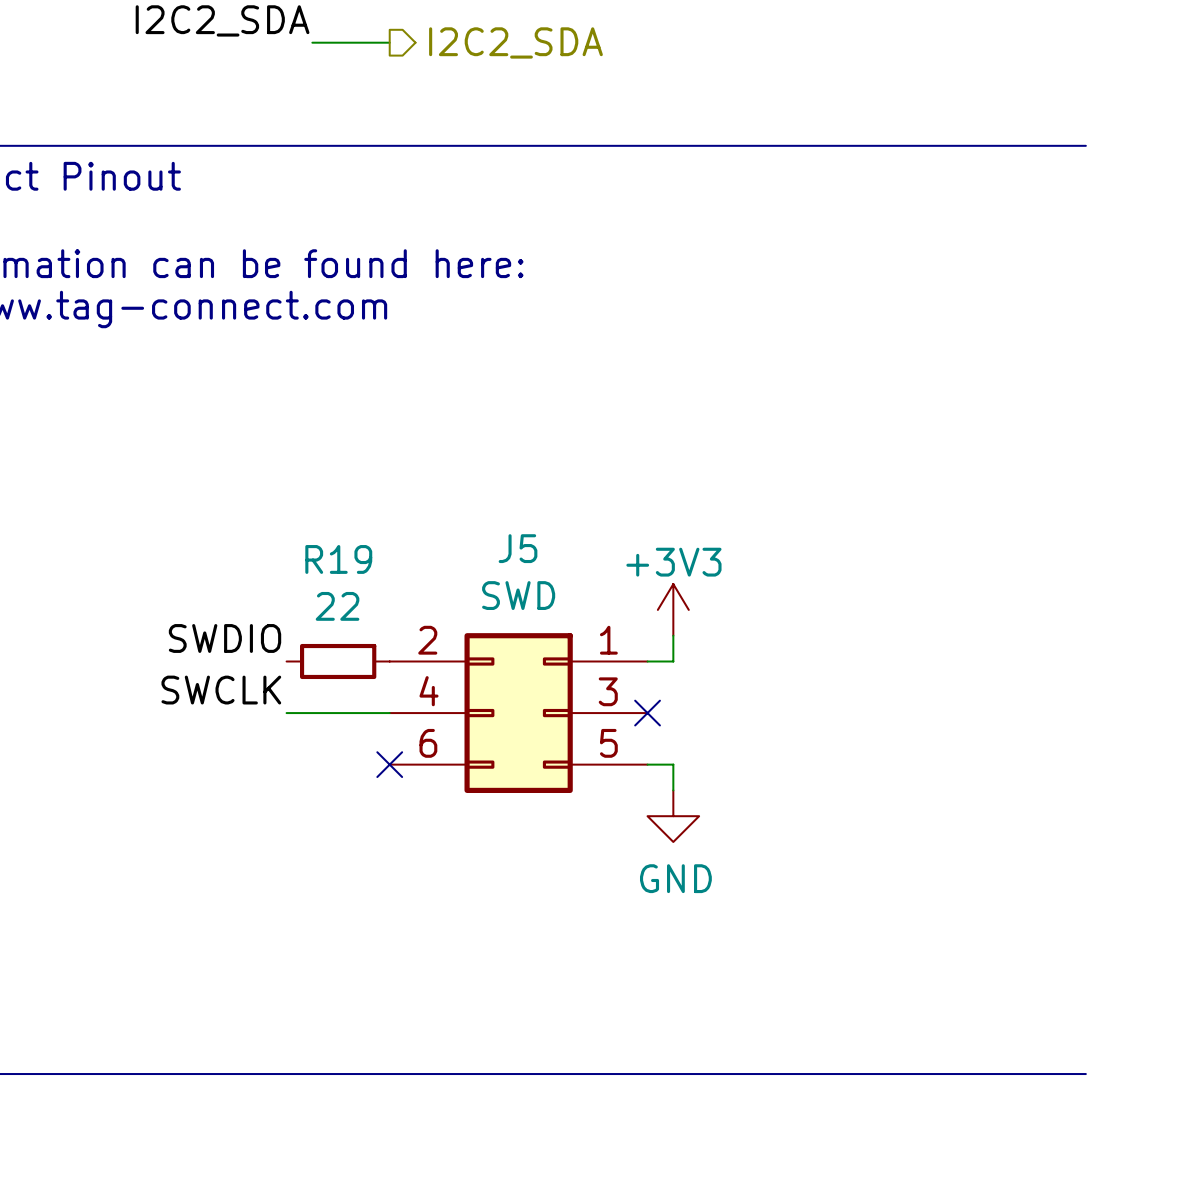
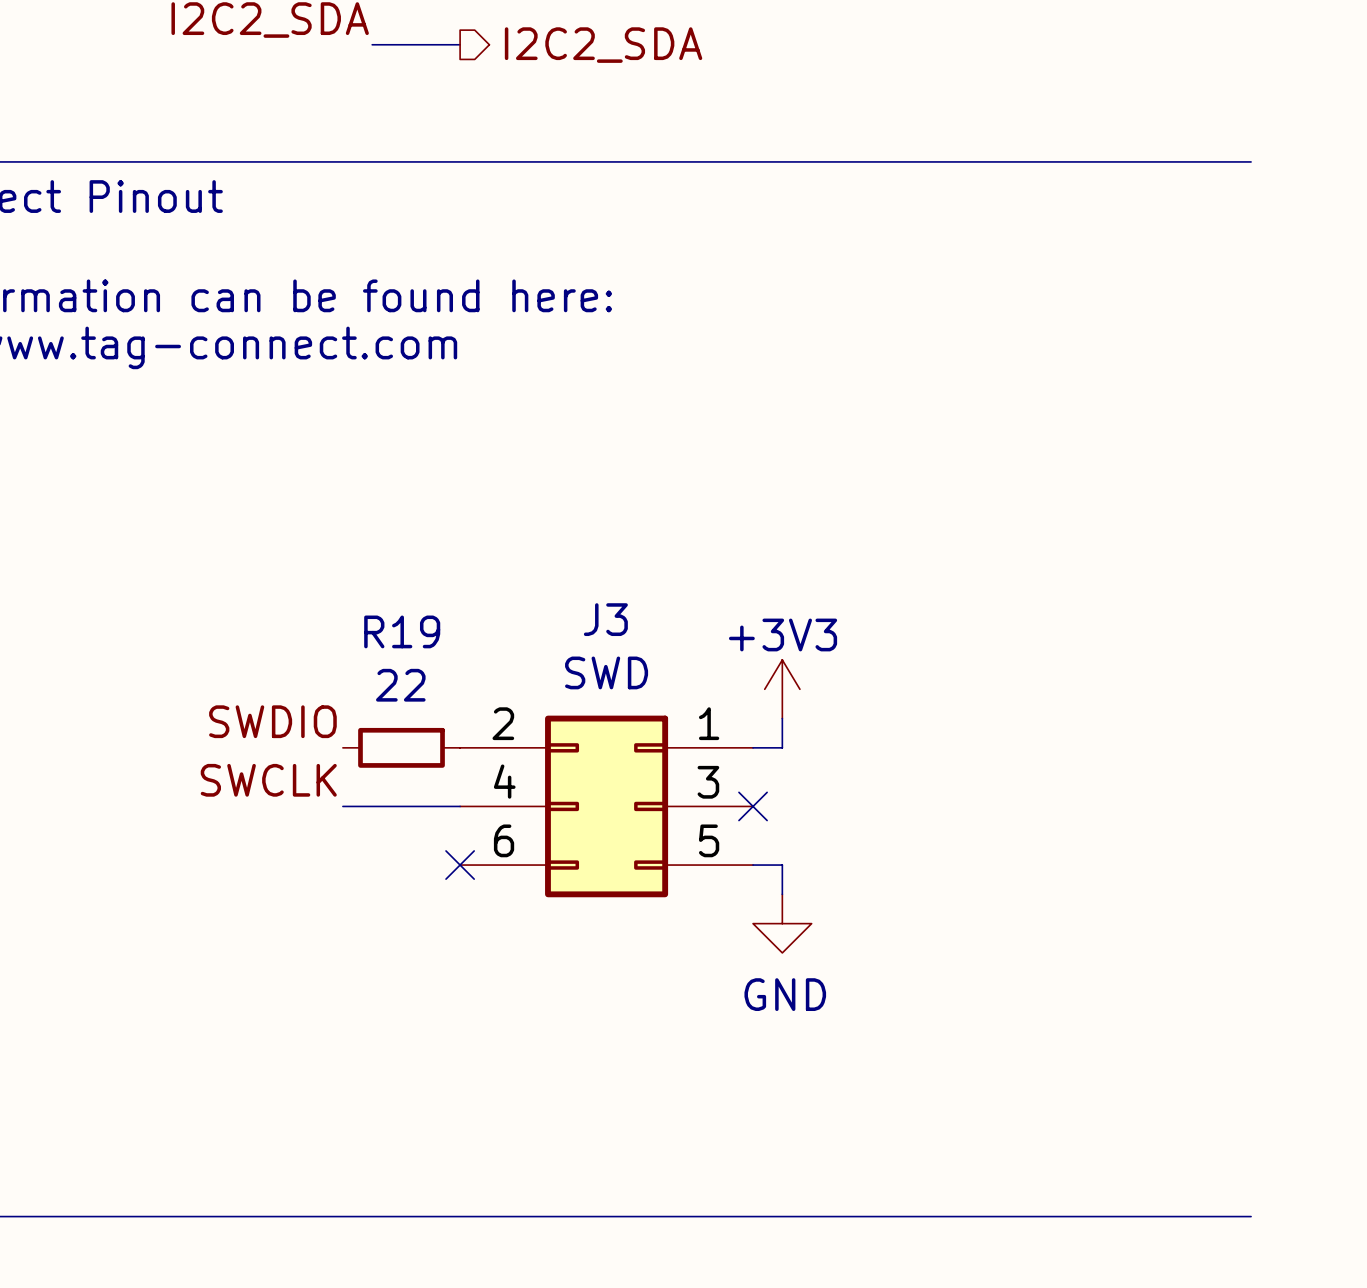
J5 name: J5 (518, 548) -> J3 (605, 619)

